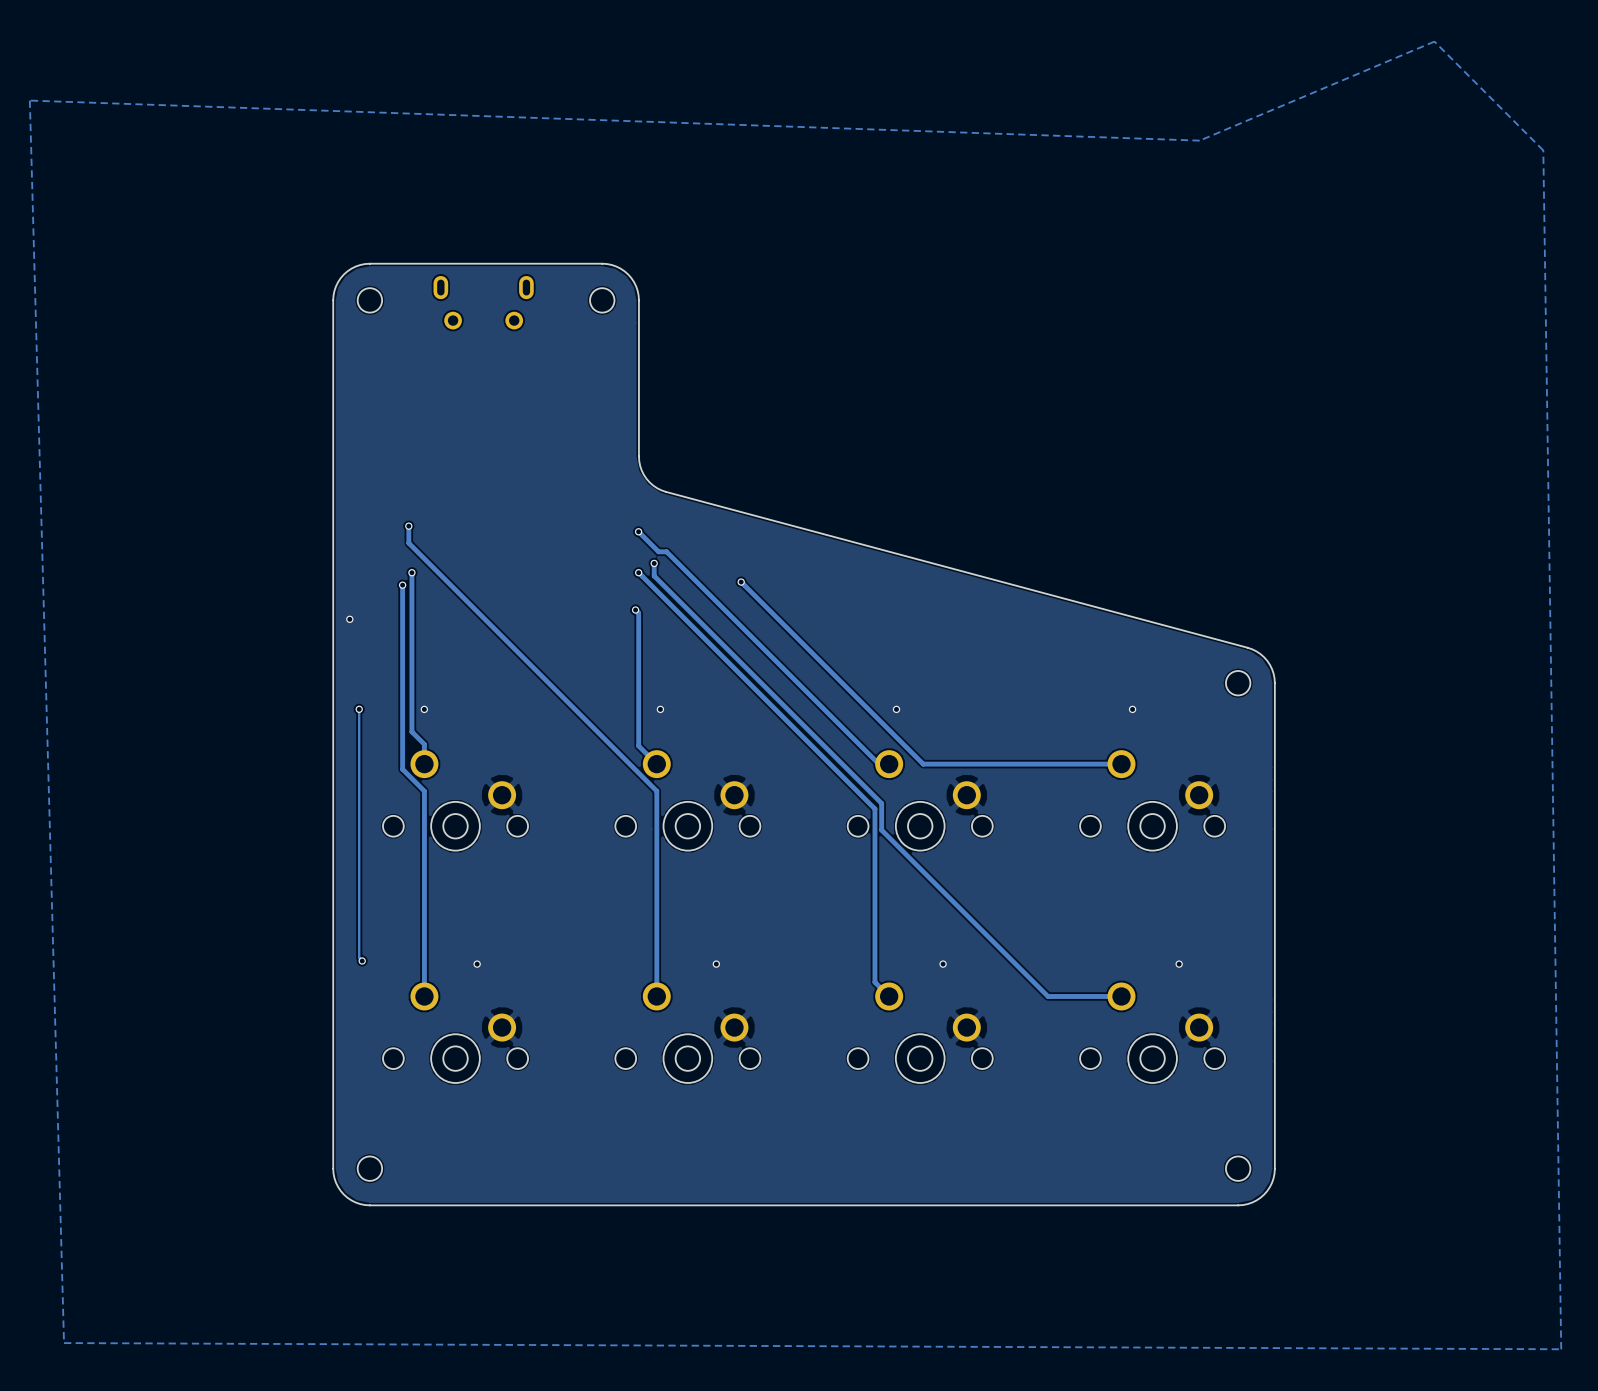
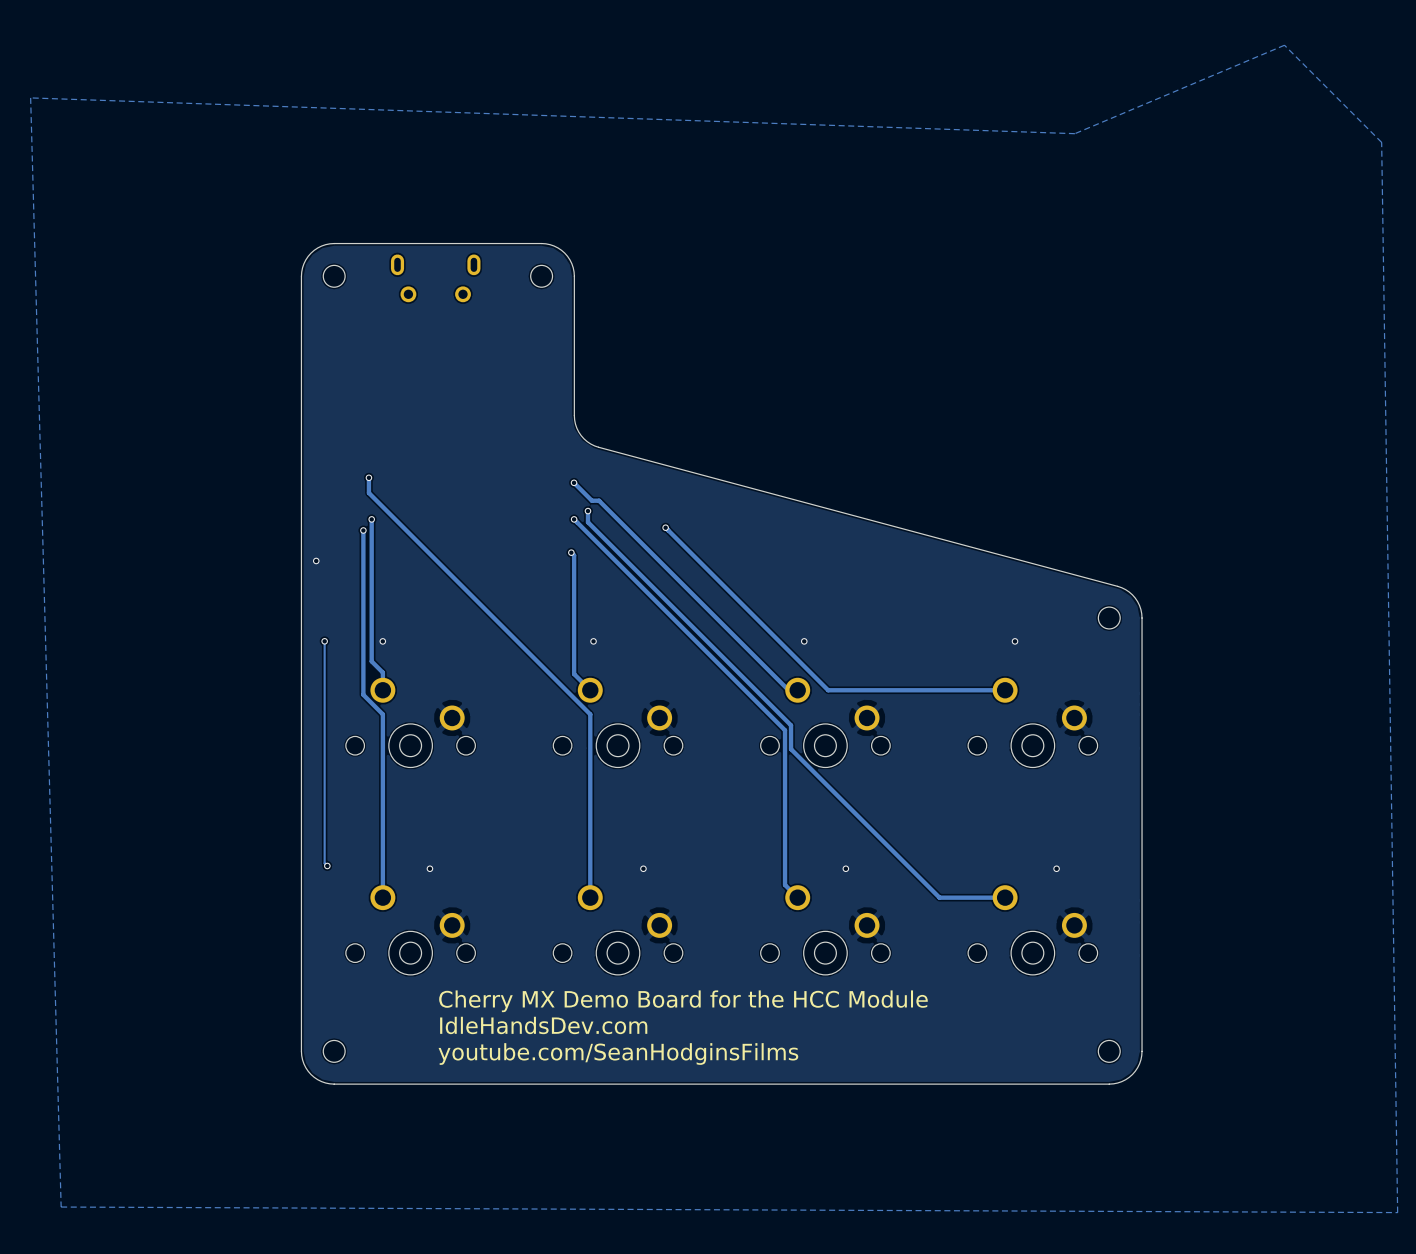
text: none -> Cherry MX Demo Board for the HCC Module (683, 1001)
text: none -> IdleHandsDev.com (543, 1025)
text: none -> youtube.com/SeanHodginsFilms (618, 1054)

